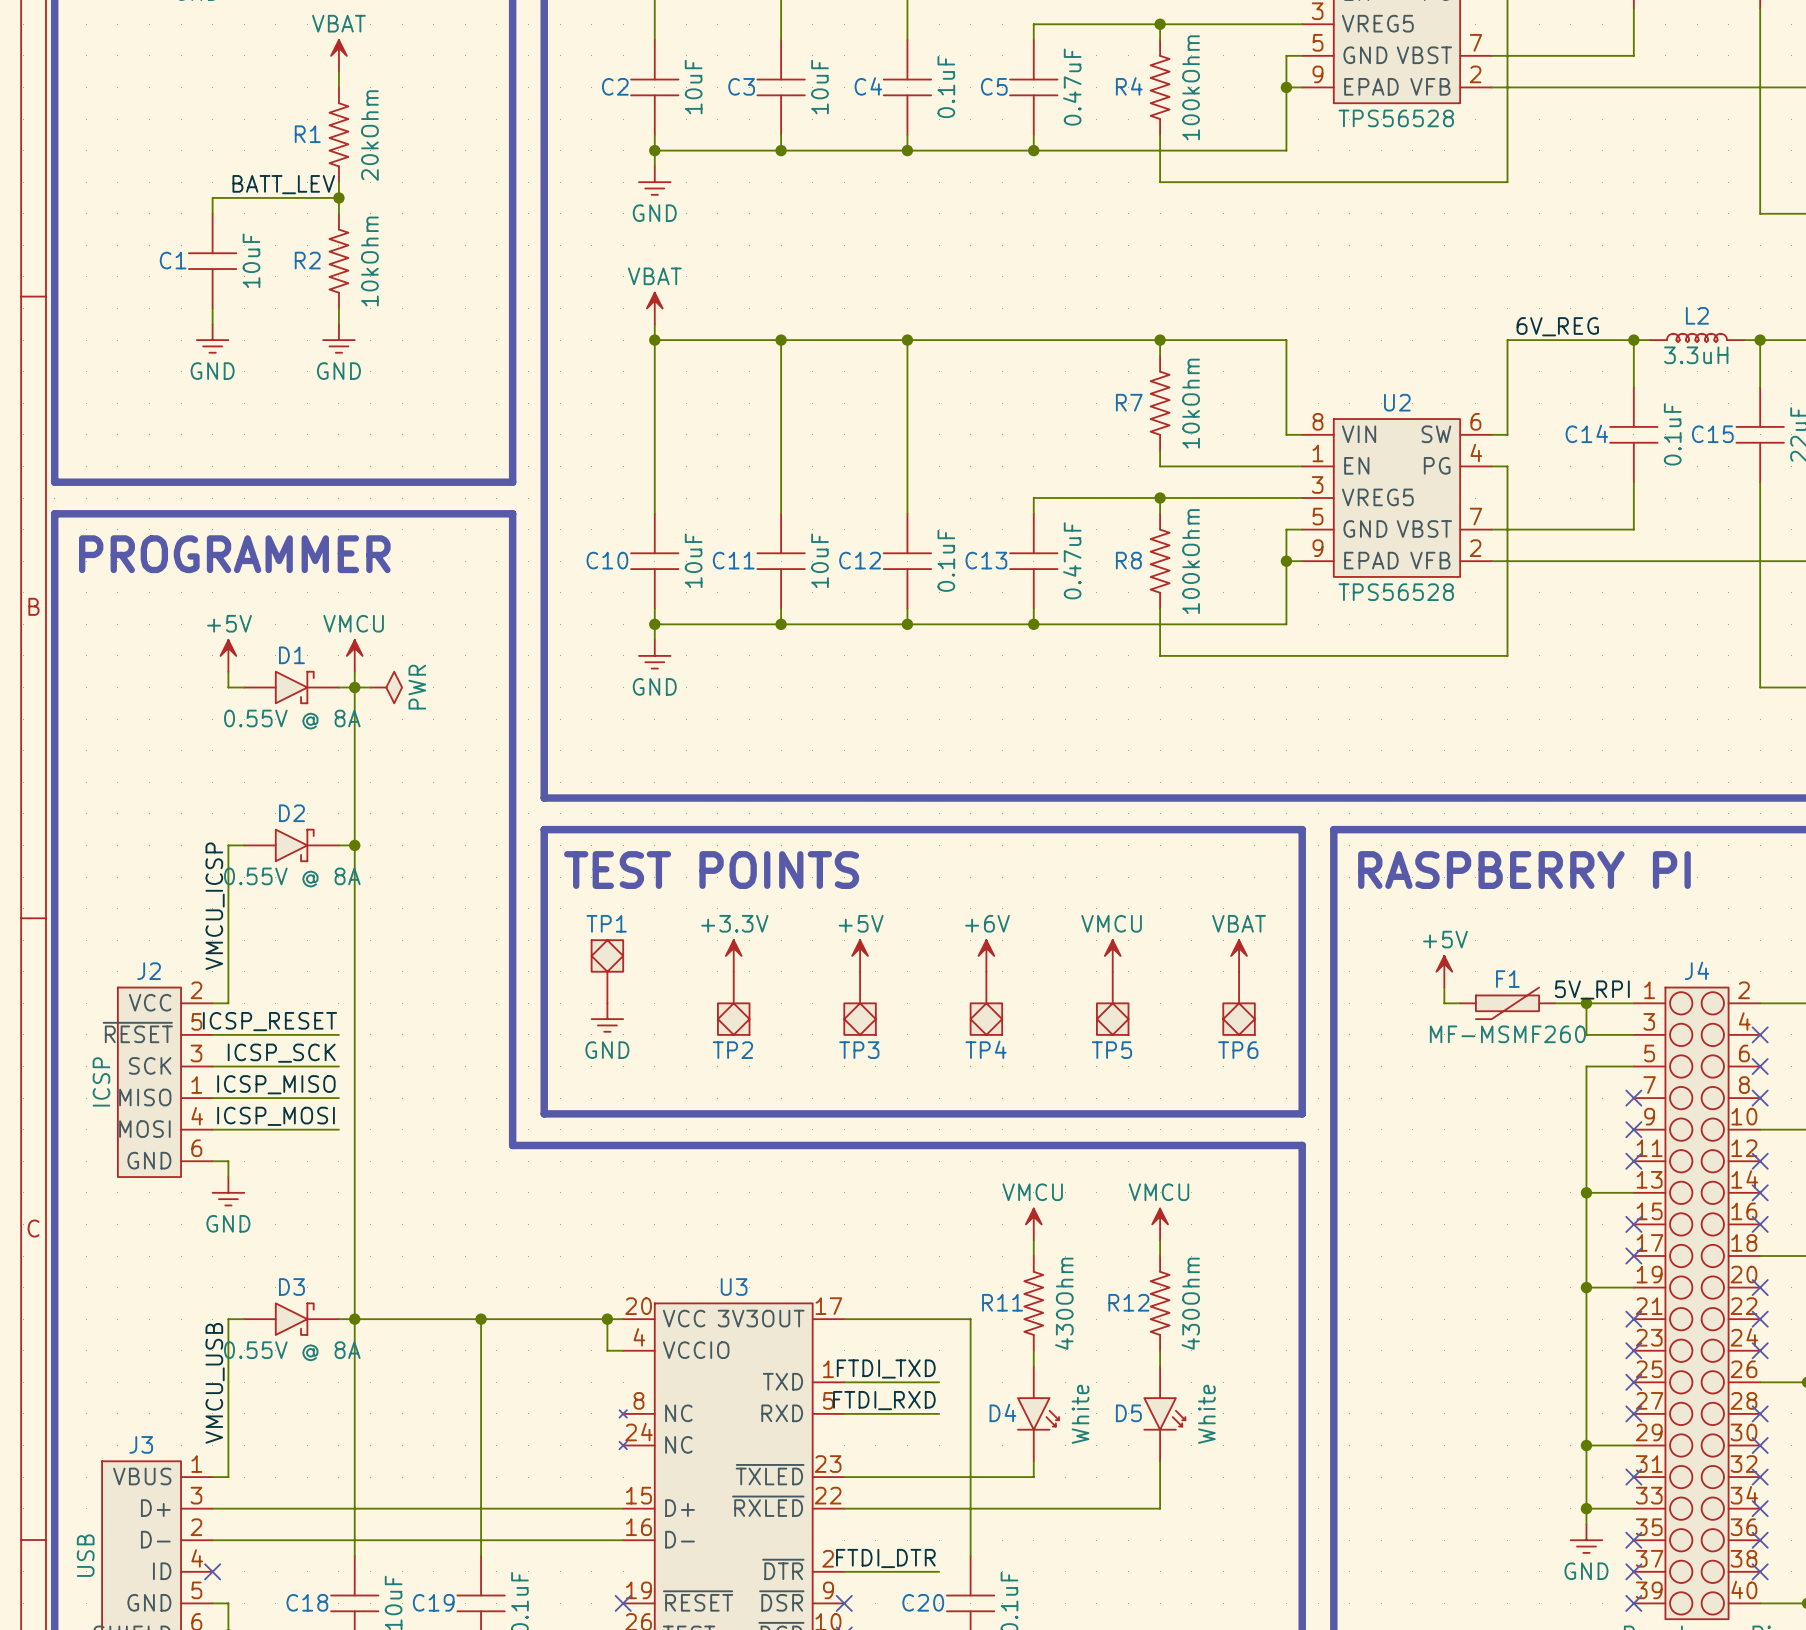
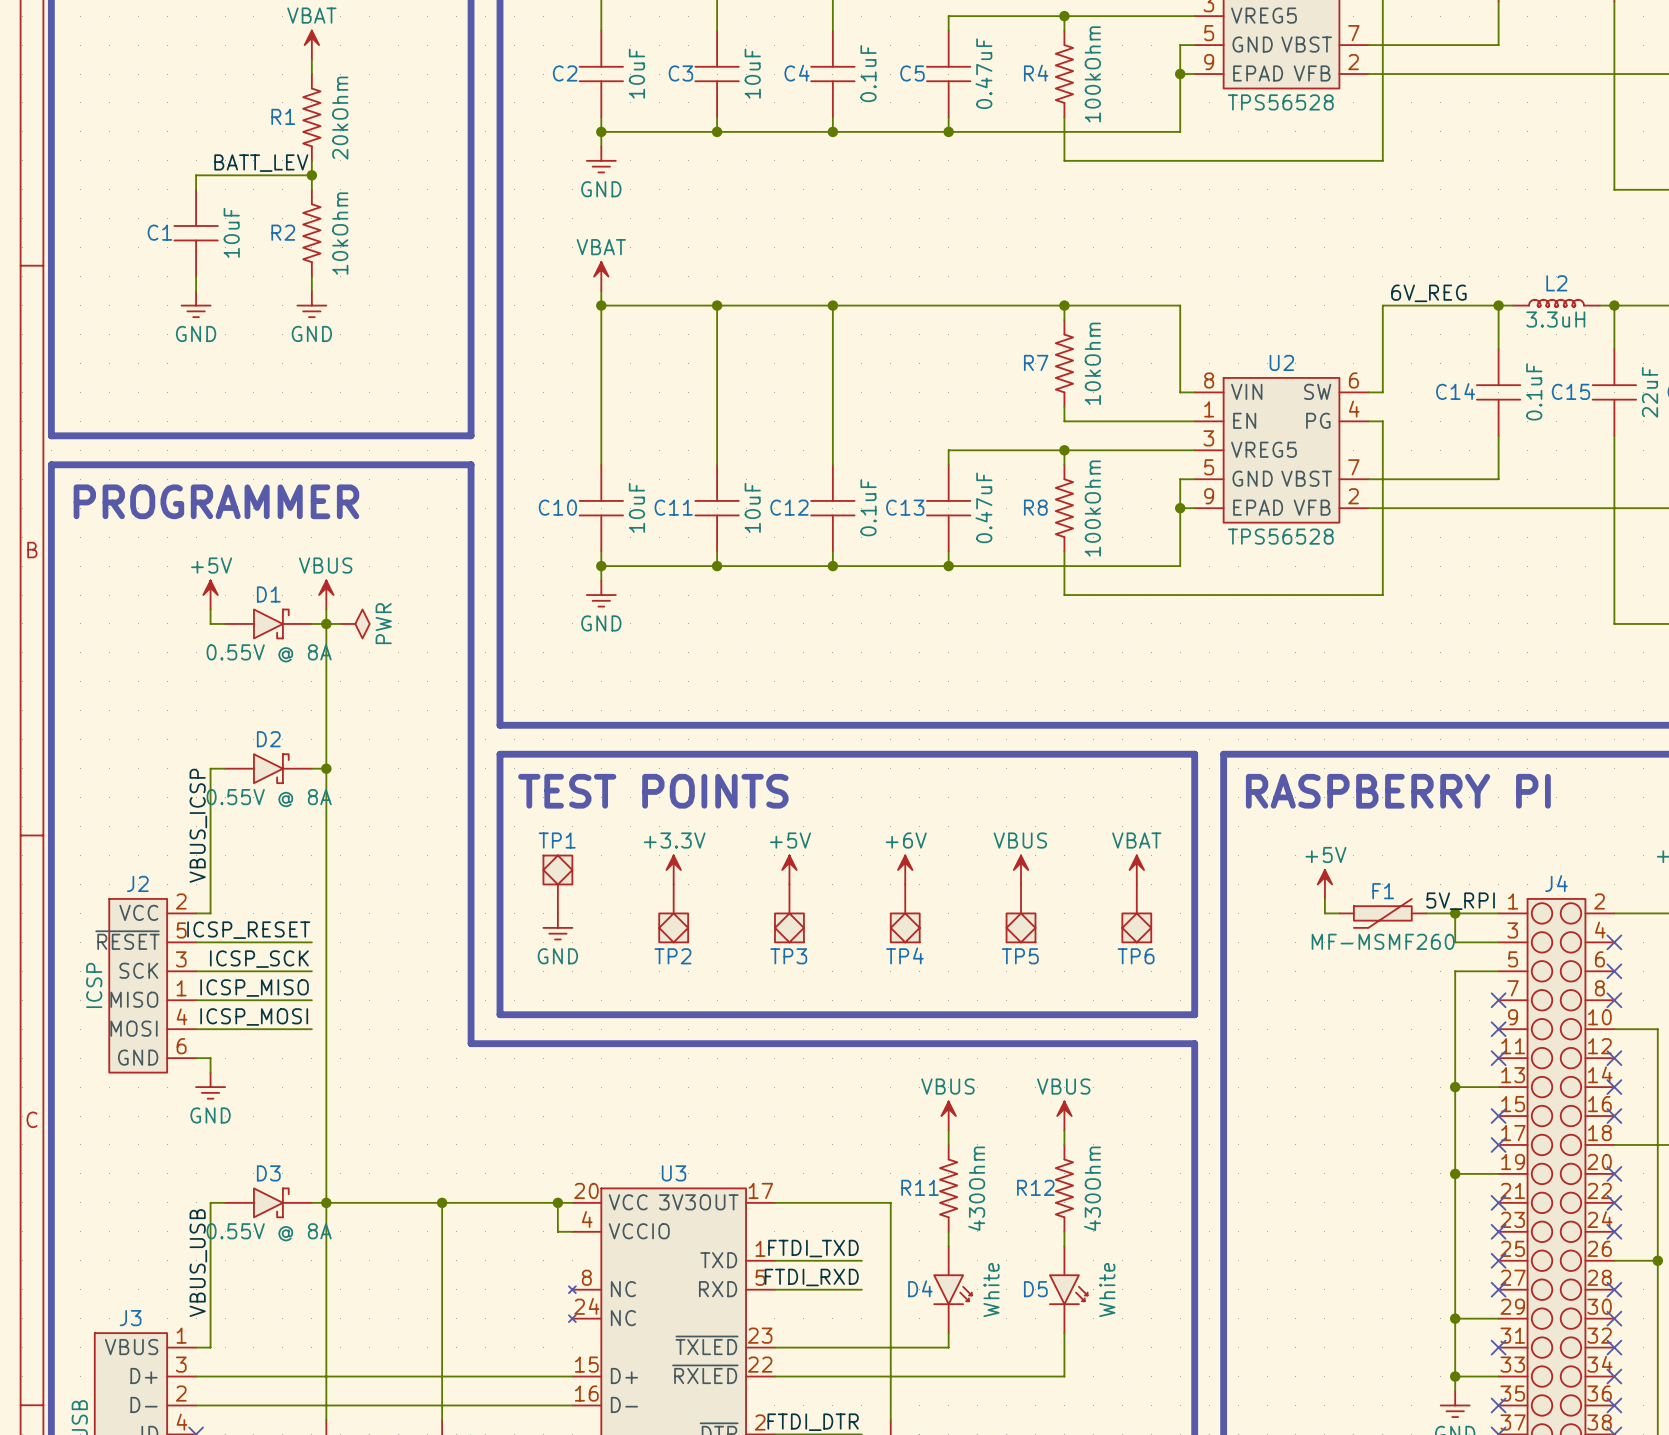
power symbol: VMCU (354, 655) -> VBUS (326, 595)
label: VMCU_ICSP (215, 906) -> VBUS_ICSP (198, 825)
power symbol: VMCU (1112, 955) -> VBUS (1021, 870)
power symbol: VMCU (1033, 1224) -> VBUS (948, 1116)
power symbol: VMCU (1160, 1224) -> VBUS (1064, 1116)
label: VMCU_USB (215, 1383) -> VBUS_USB (198, 1263)

